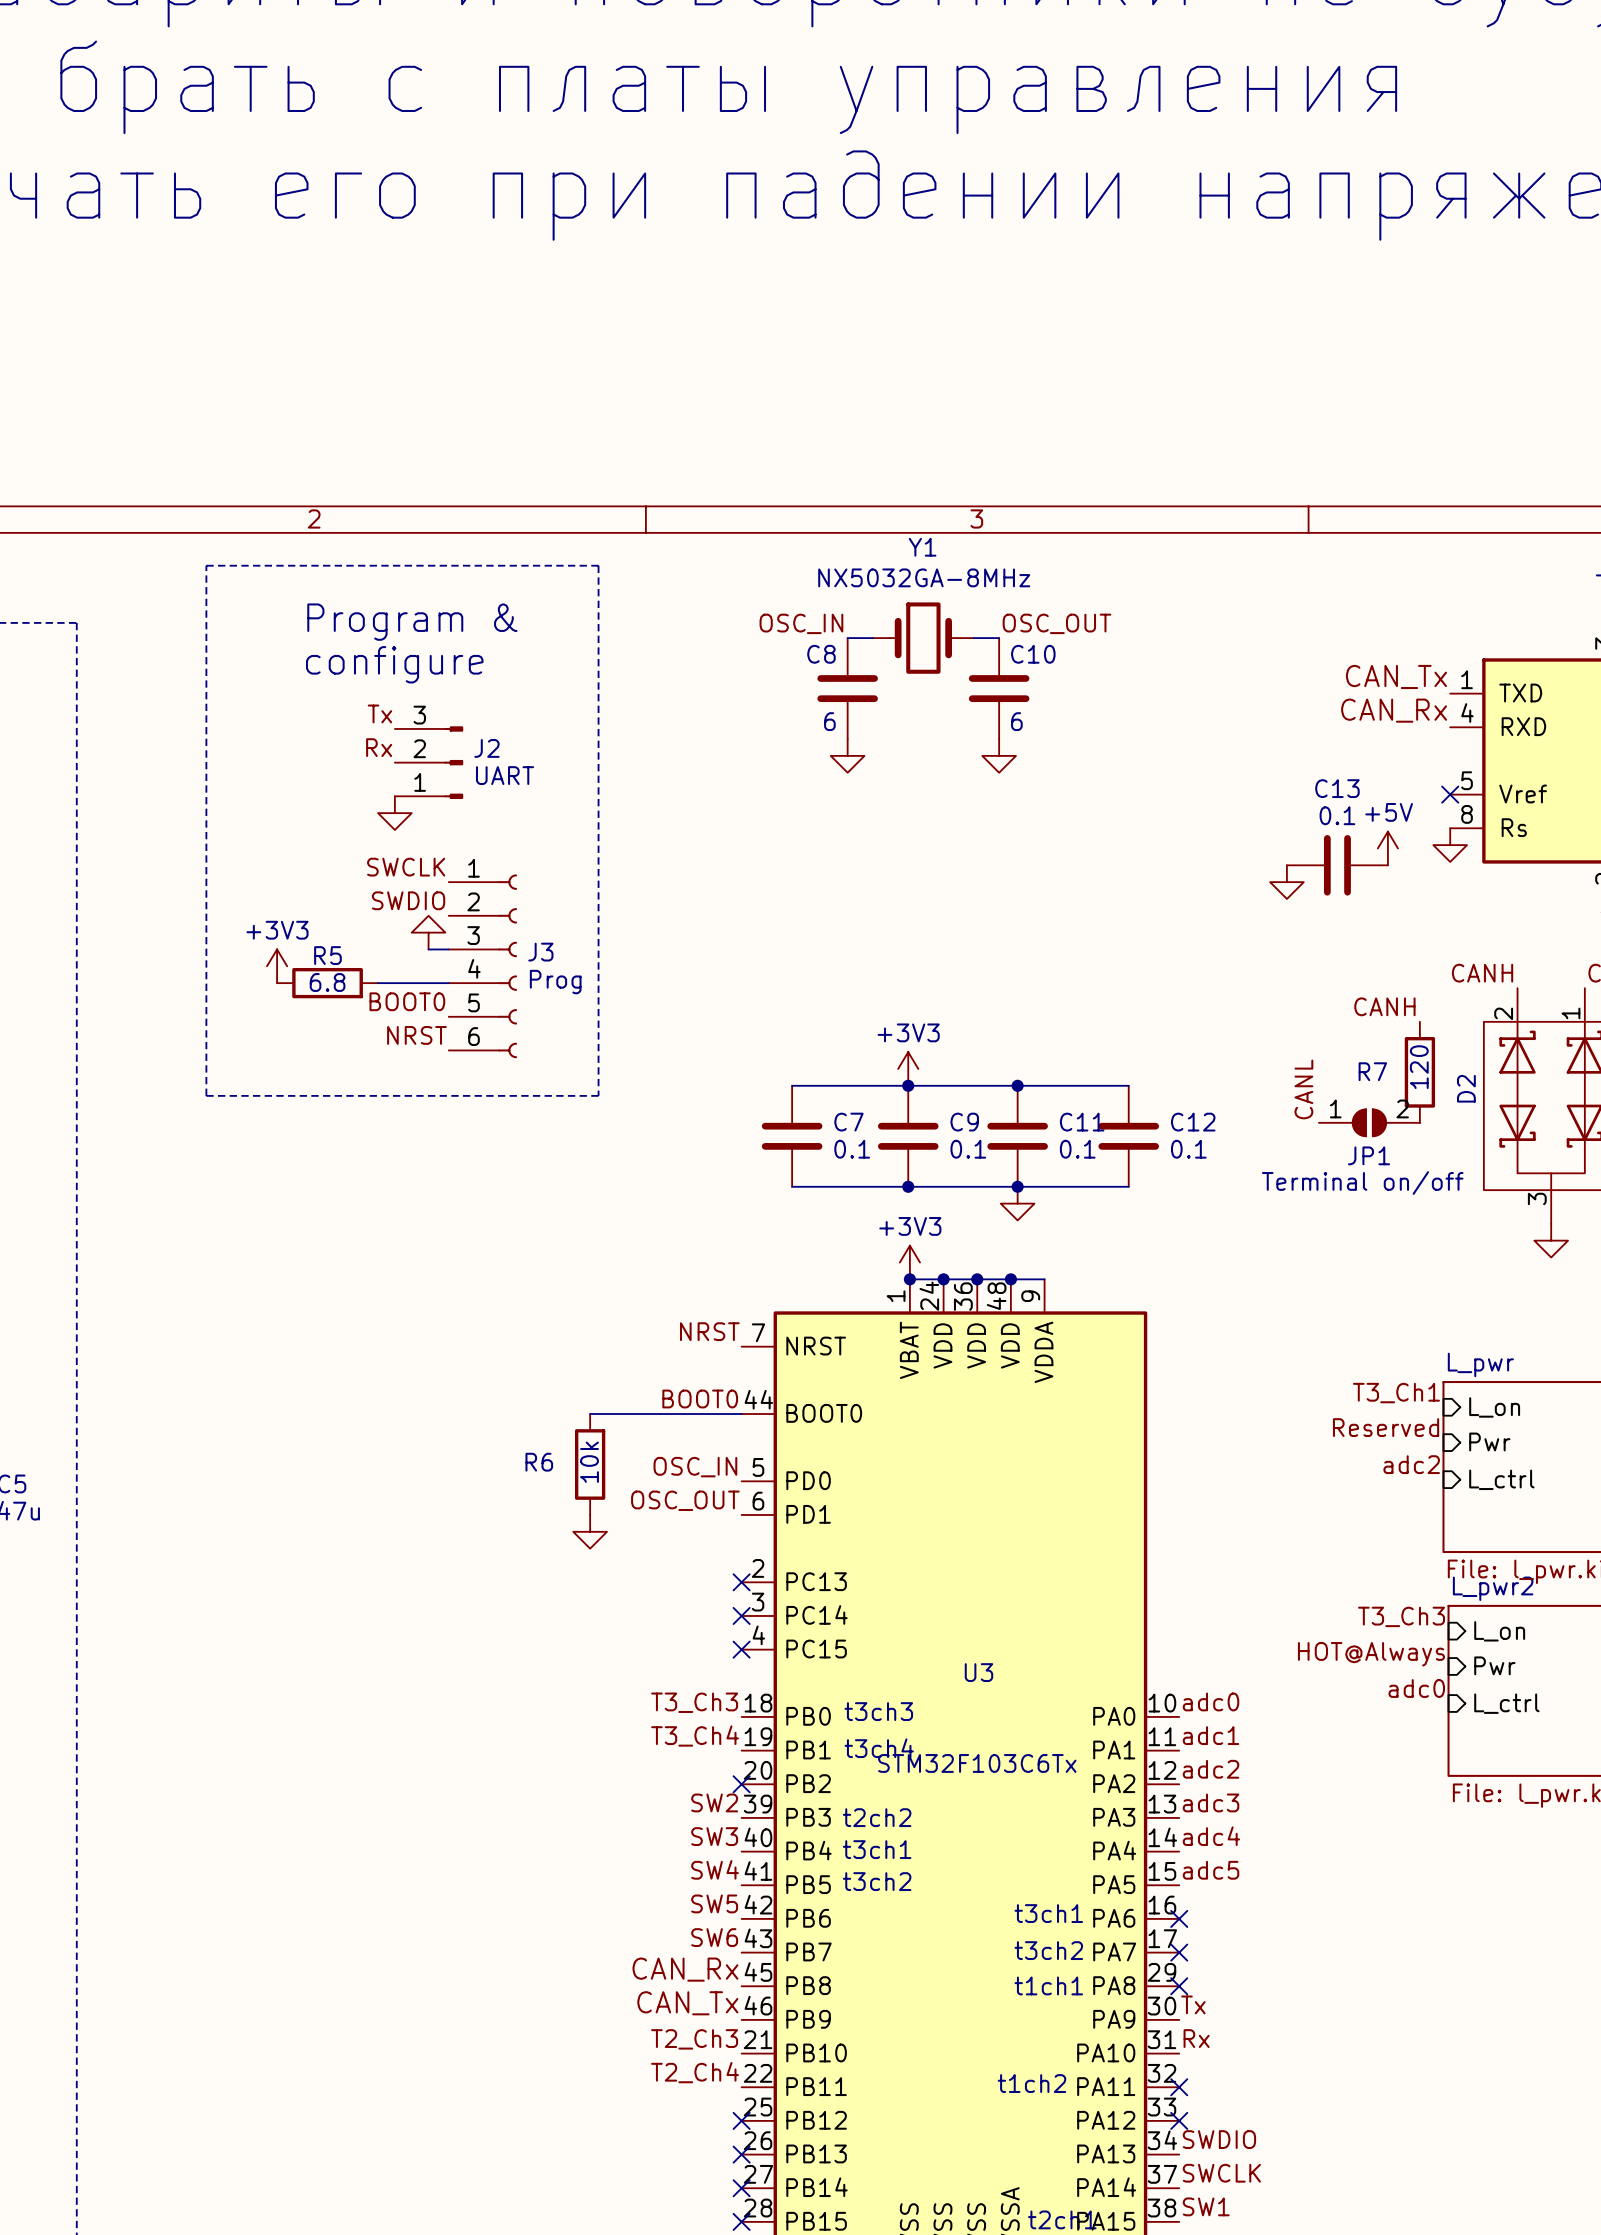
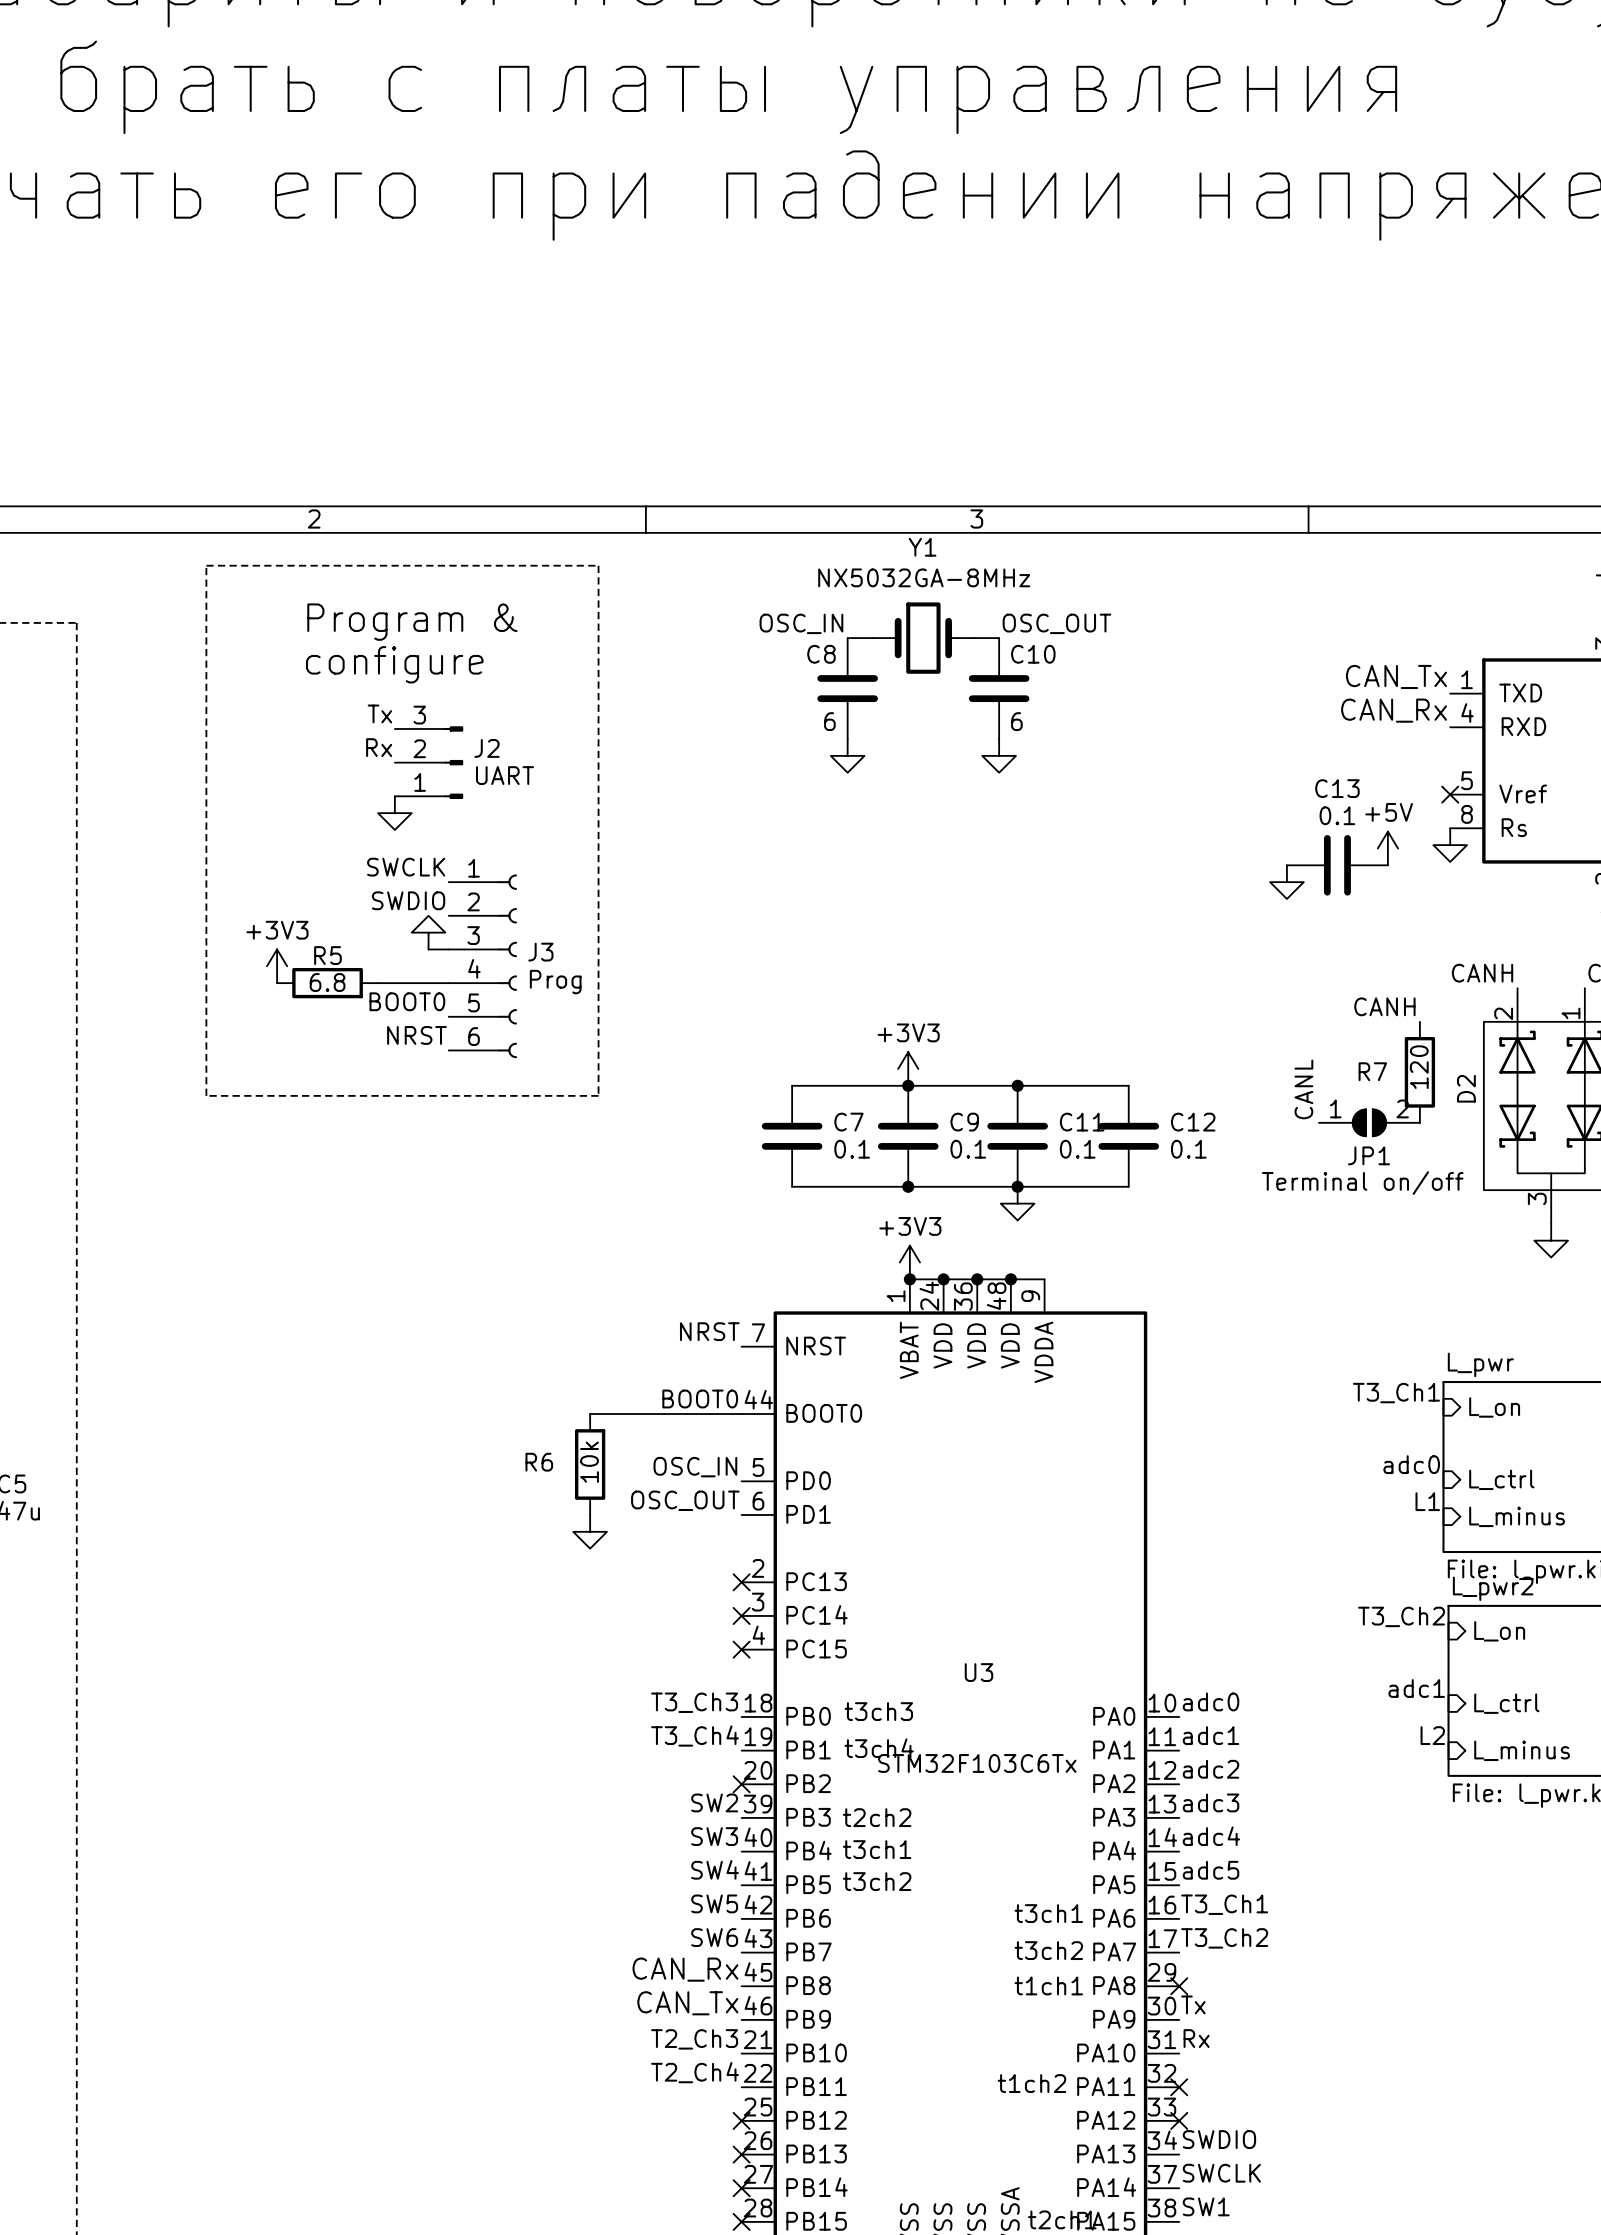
label: Reserved (1386, 1427) -> none
sheet pin: Pwr (1489, 1441) -> none
label: adc2 (1411, 1464) -> adc0 (1411, 1464)
label: none -> L1 (1427, 1501)
sheet pin: none -> L_minus (1517, 1516)
label: T3_Ch3 (1401, 1616) -> T3_Ch2 (1401, 1616)
label: HOT@Always (1371, 1654) -> none
sheet pin: Pwr (1494, 1665) -> none
label: adc0 (1416, 1688) -> adc1 (1416, 1688)
label: none -> L2 (1432, 1735)
sheet pin: none -> L_minus (1522, 1750)
label: none -> T3_Ch1 (1224, 1904)
no-connect mark: (1179, 1918) -> none
label: none -> T3_Ch2 (1224, 1938)
no-connect mark: (1179, 1952) -> none

